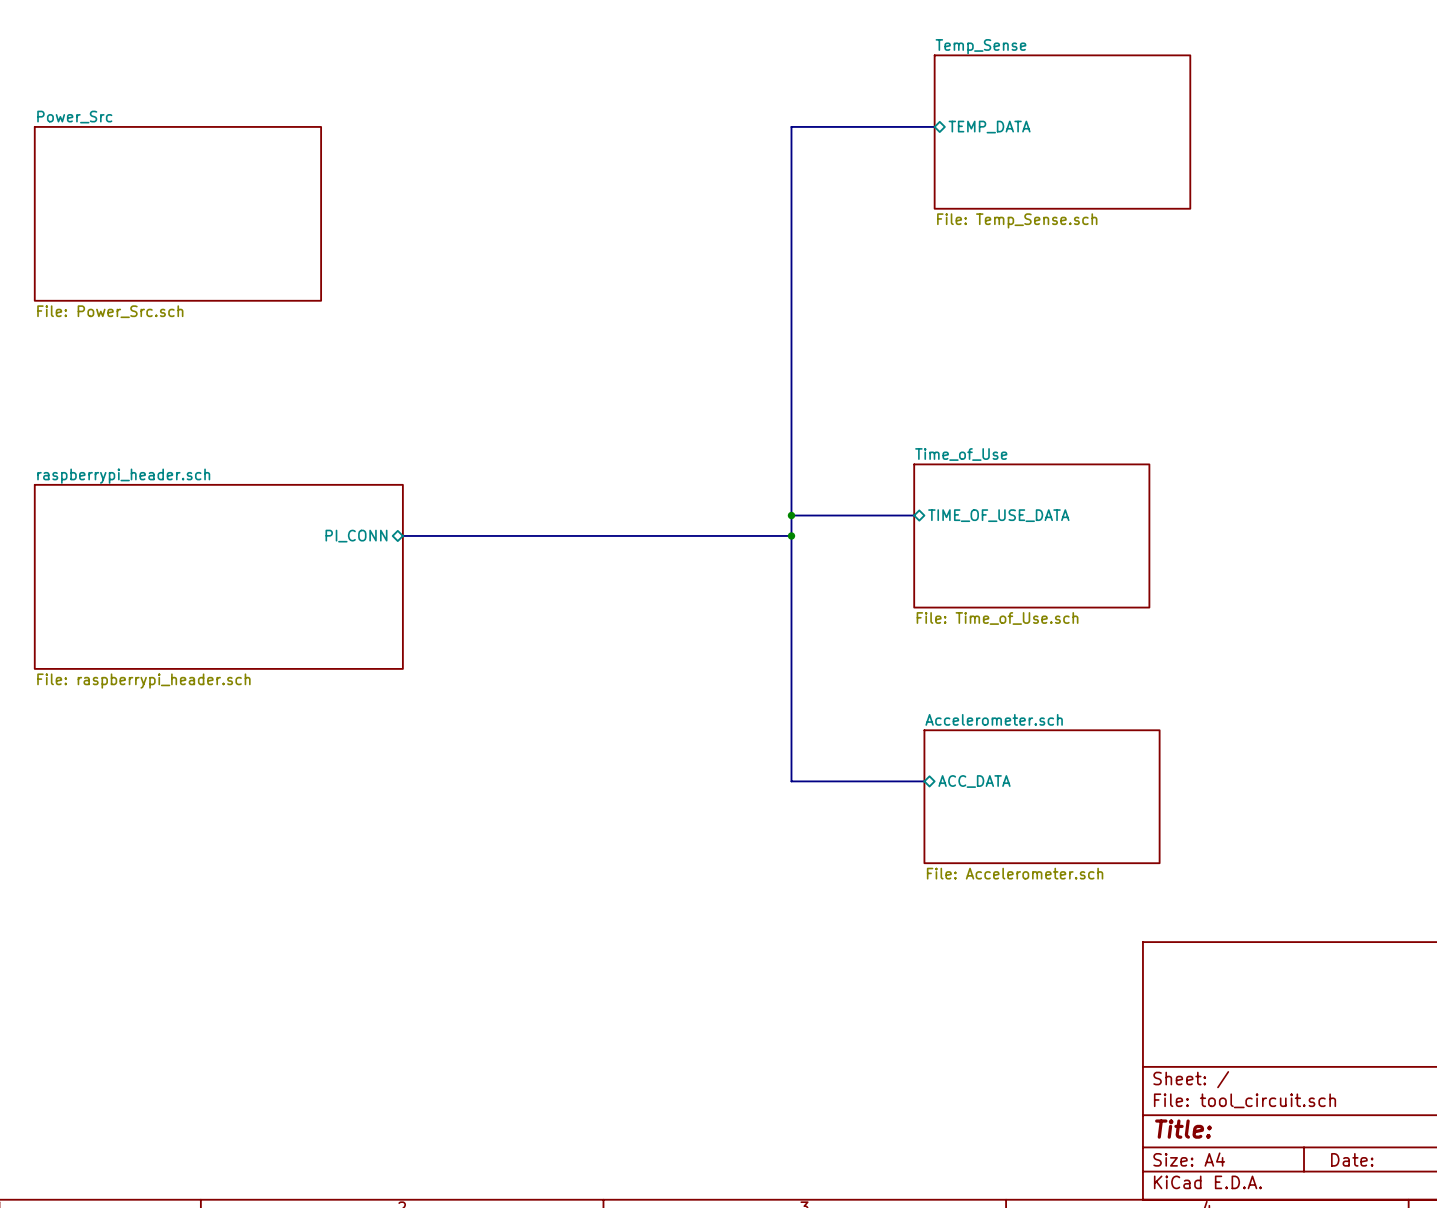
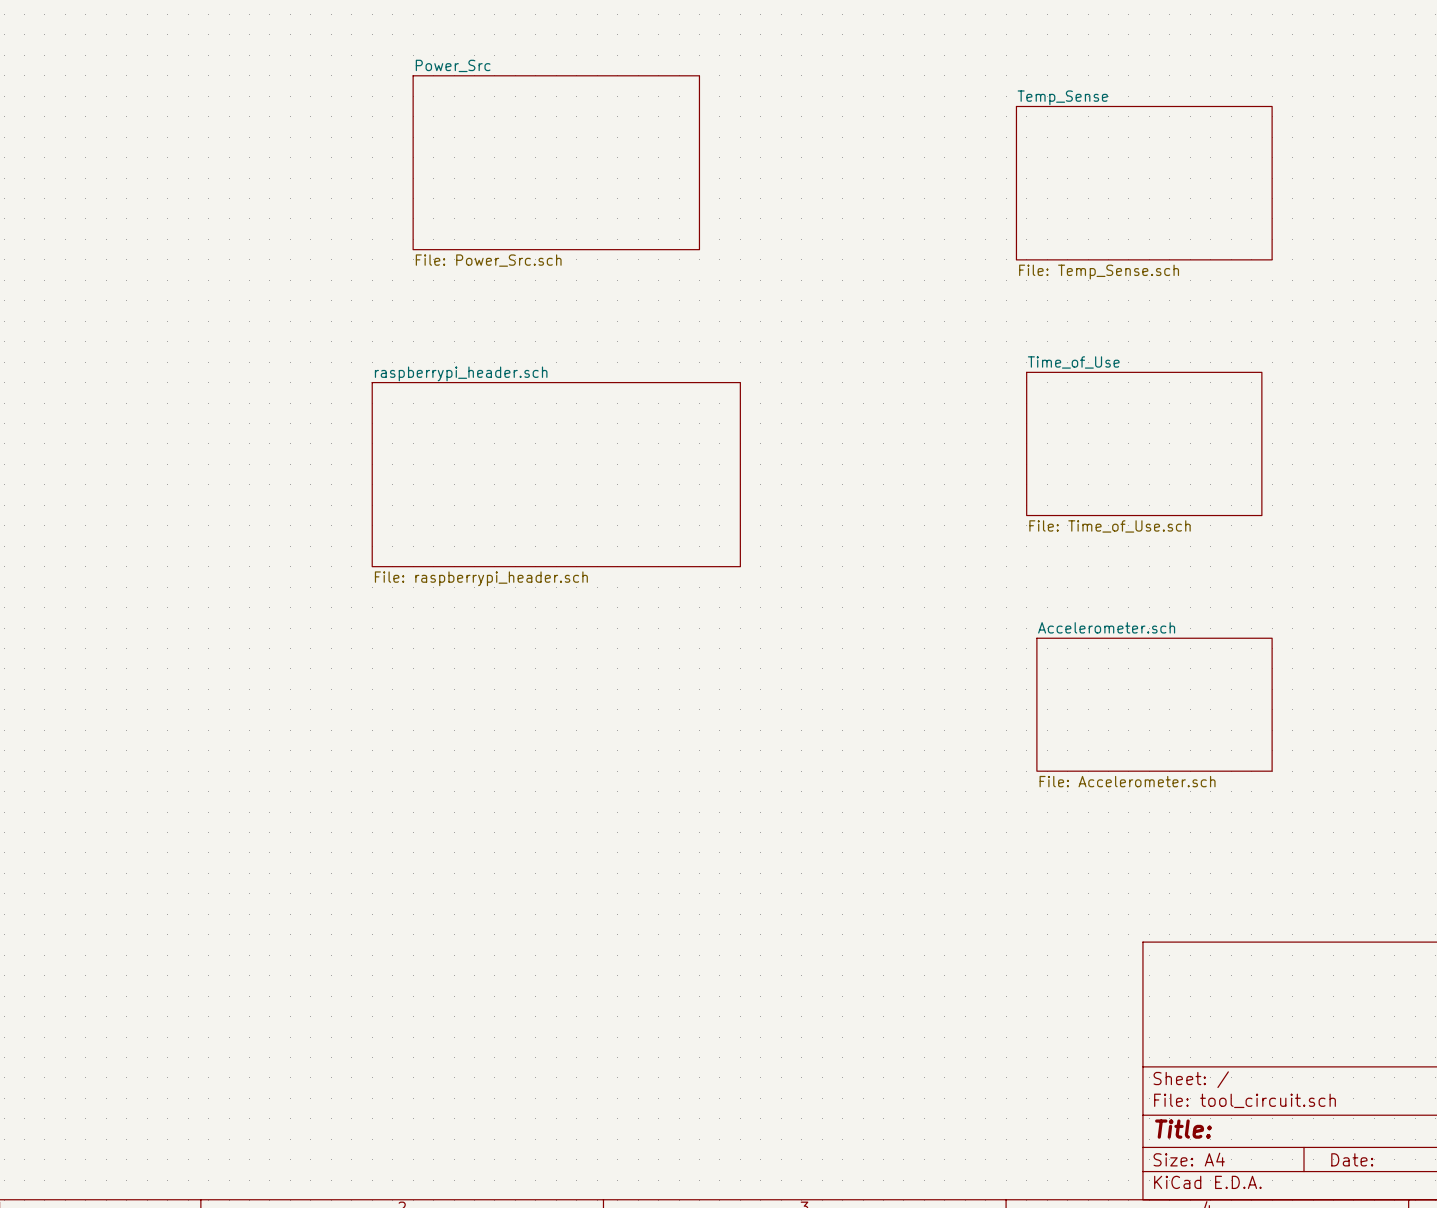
bus: (934, 126) (791, 126) (791, 781) (924, 781) -> none
sheet pin: TEMP_DATA (989, 127) -> none
sheet Temp_Sense position: (1062, 132) -> (1144, 183)
sheet Power_Src: none -> File: Power_Src.sch (556, 162)
sheet Power_Src: File: Power_Src.sch (177, 213) -> none
sheet raspberrypi_header.sch: none -> File: raspberrypi_header.sch (556, 474)
bus: (791, 515) (914, 515) -> none
junction: (791, 515) -> none
sheet pin: TIME_OF_USE_DATA (998, 515) -> none
bus: (402, 535) (791, 535) -> none
junction: (791, 535) -> none
sheet Time_of_Use position: (1031, 535) -> (1144, 443)
sheet pin: PI_CONN (356, 536) -> none
sheet raspberrypi_header.sch: File: raspberrypi_header.sch (218, 576) -> none
sheet pin: ACC_DATA (974, 781) -> none
sheet Accelerometer.sch position: (1042, 796) -> (1154, 704)

